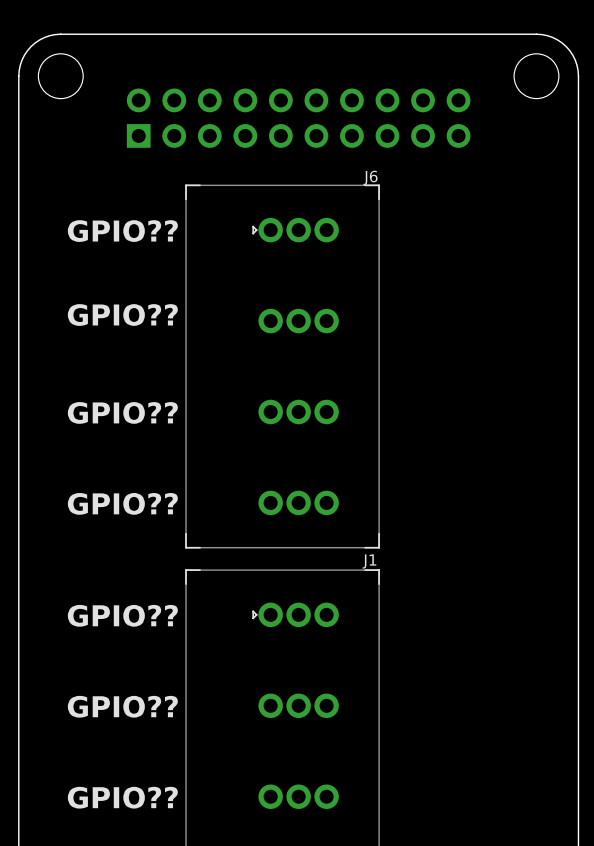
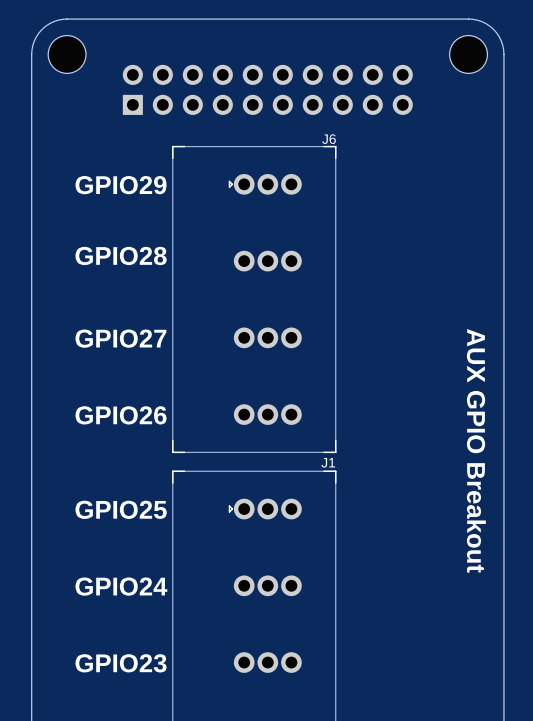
text: GPIO?? (122, 231) -> GPIO29 (121, 185)
text: GPIO?? (122, 315) -> GPIO28 (121, 255)
text: GPIO?? (122, 412) -> GPIO27 (120, 338)
text: GPIO?? (122, 503) -> GPIO26 (121, 415)
text: none -> AUX GPIO Breakout (476, 450)
text: GPIO?? (122, 615) -> GPIO25 (121, 509)
text: GPIO?? (122, 706) -> GPIO24 (121, 586)
text: GPIO?? (122, 797) -> GPIO23 (121, 663)

